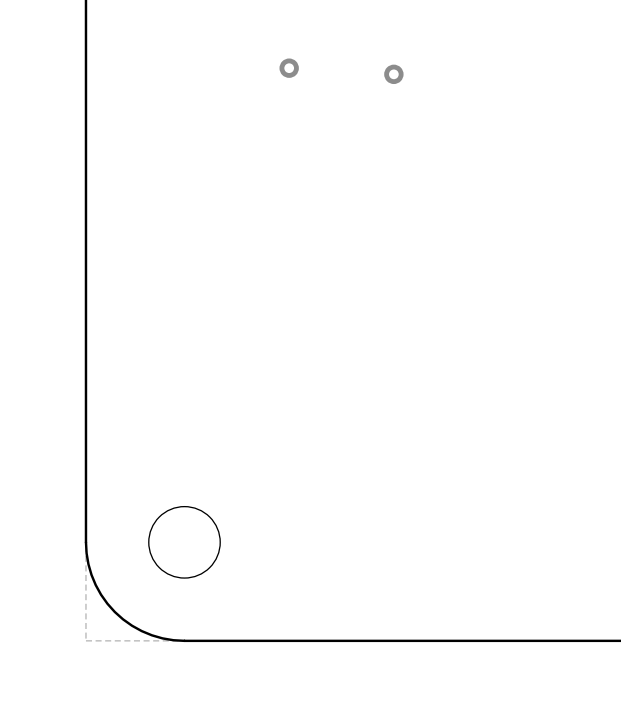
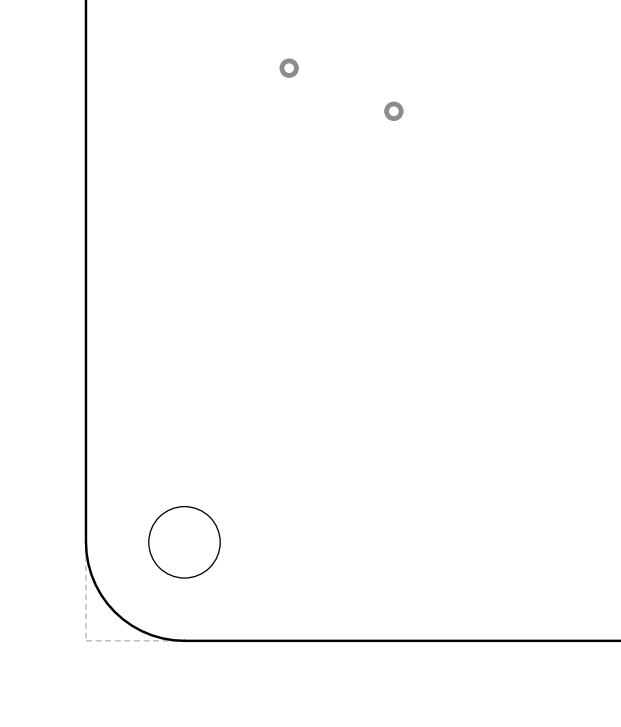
via position: (393, 74) -> (393, 111)

